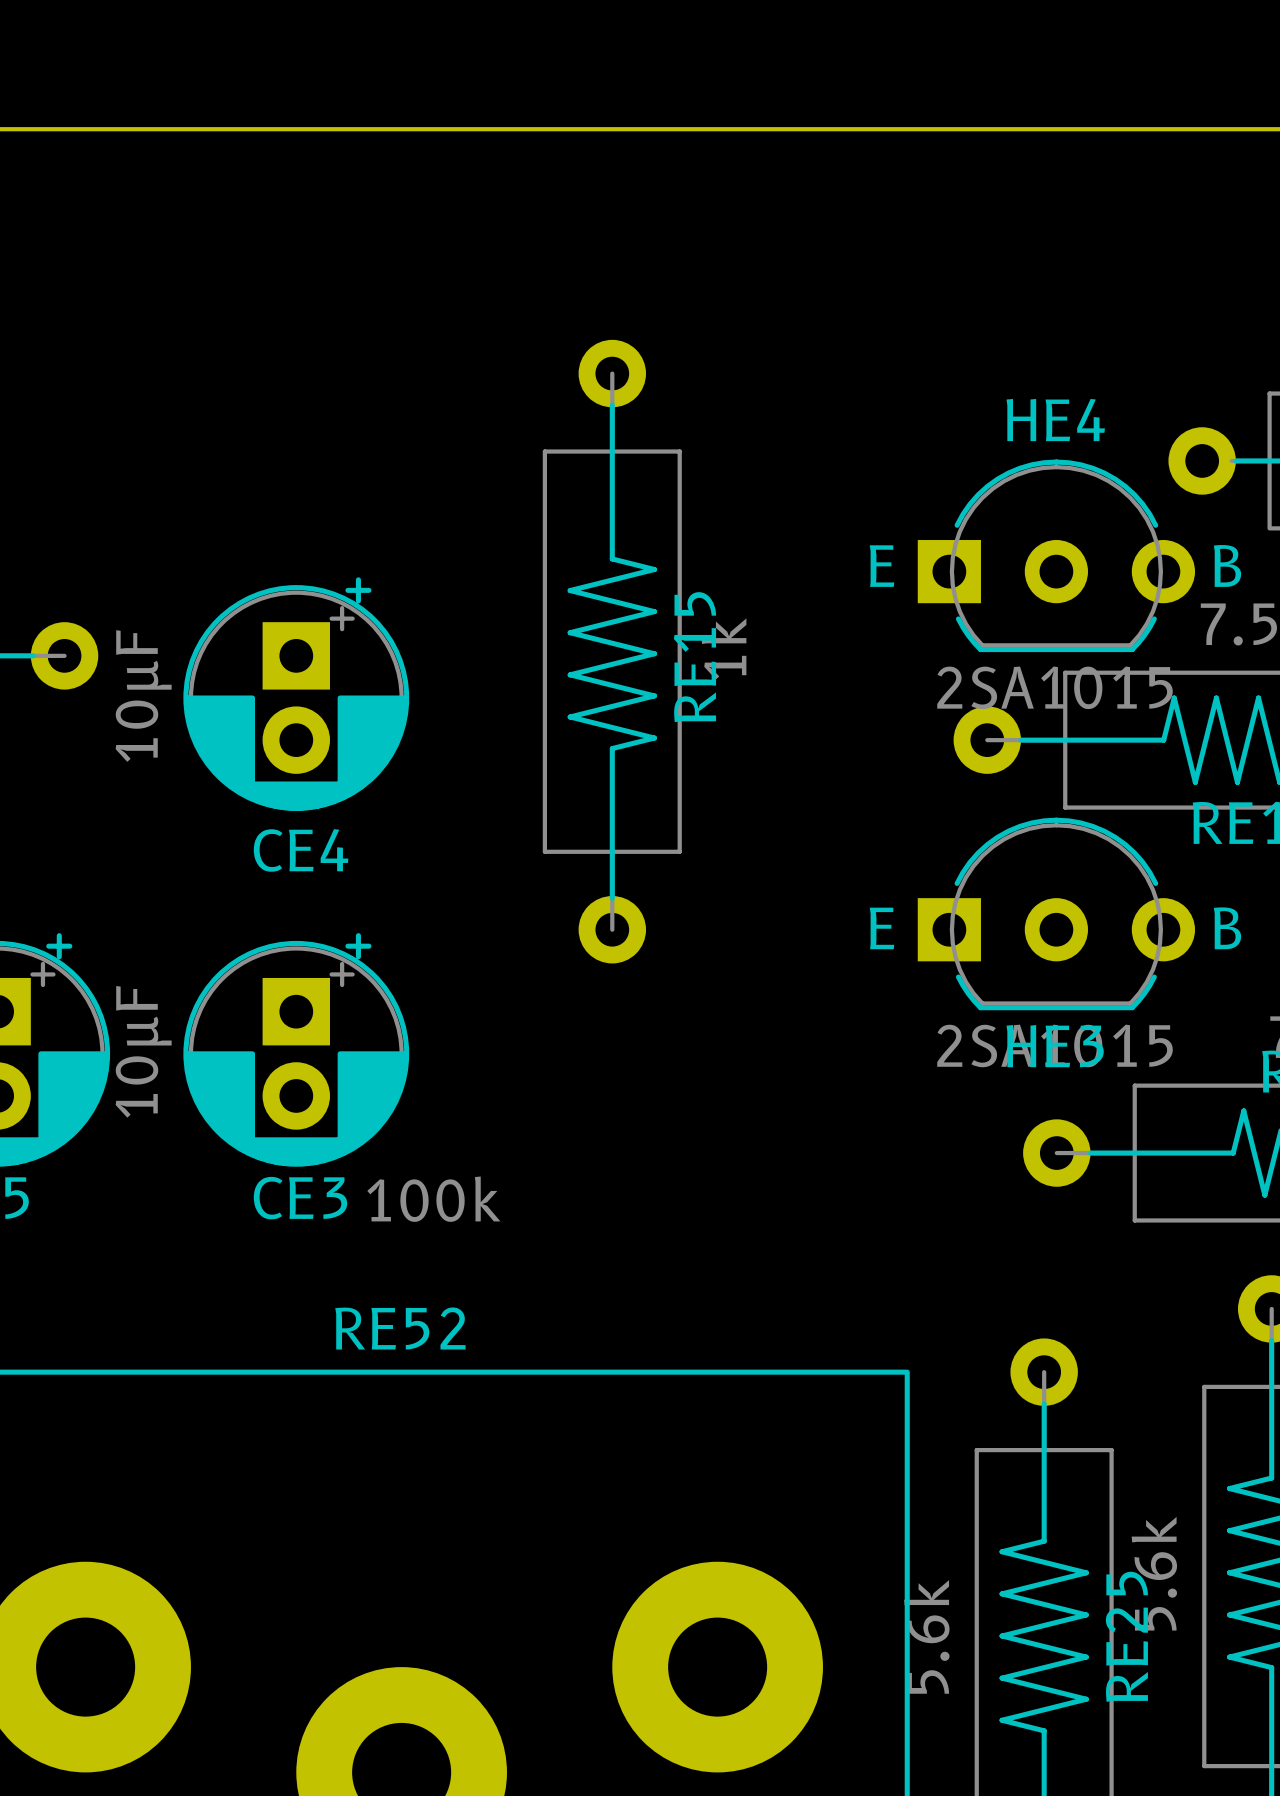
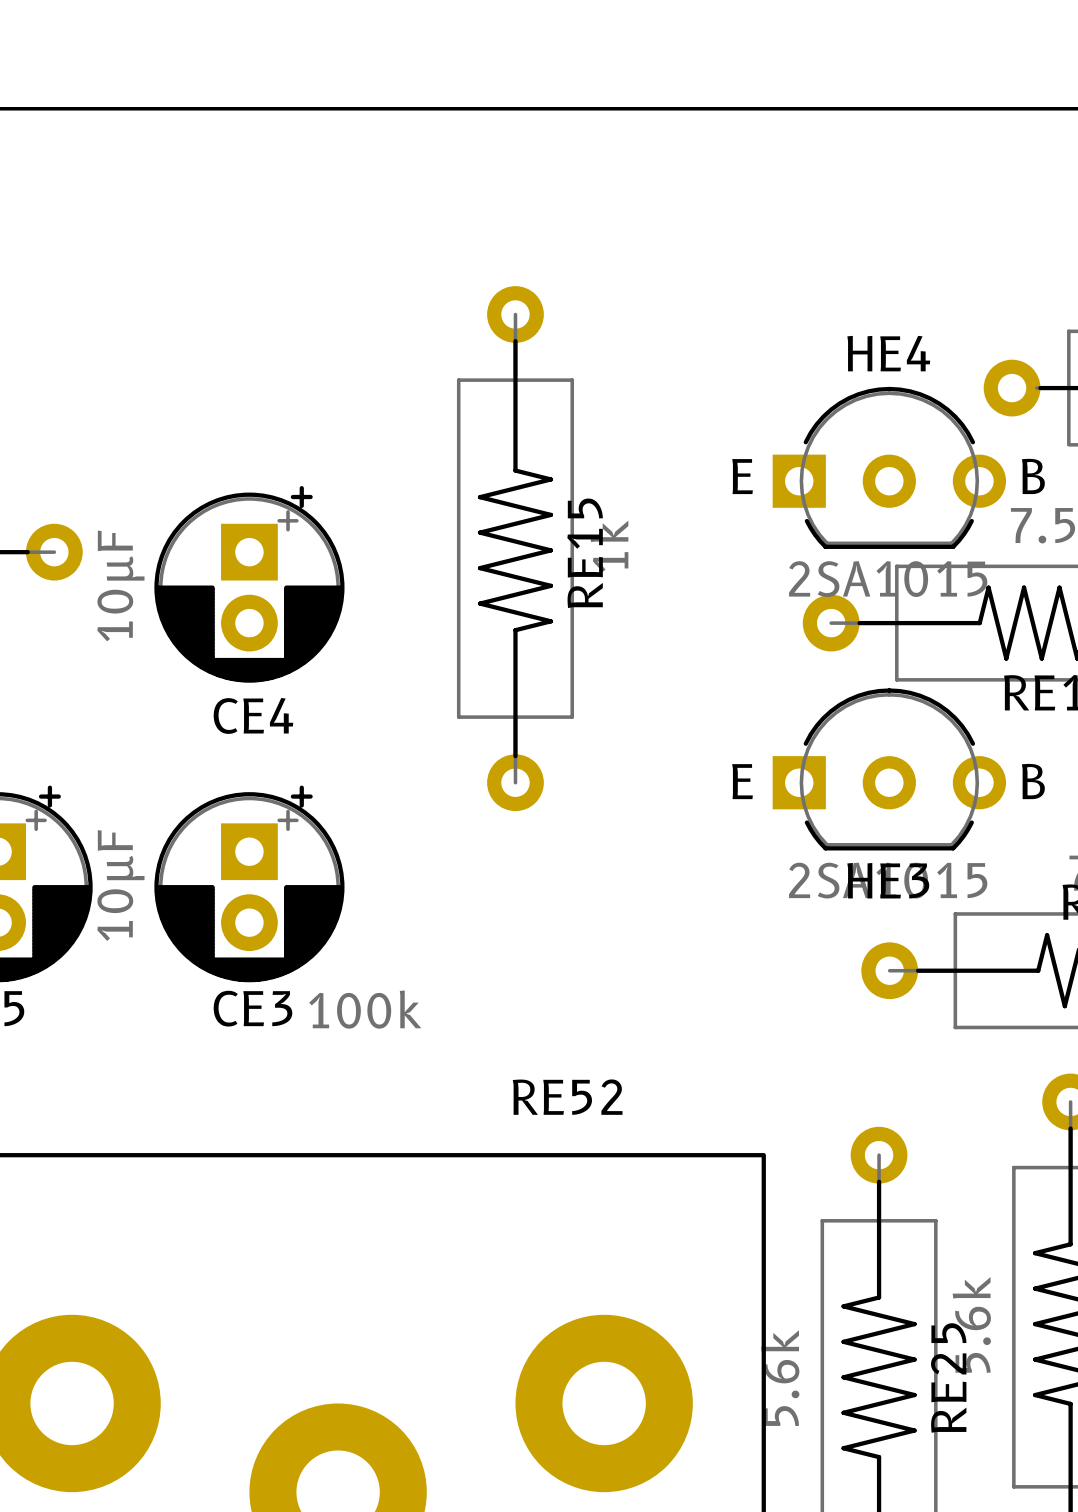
RE52 name position: RE52 (400, 1328) -> RE52 (567, 1097)

